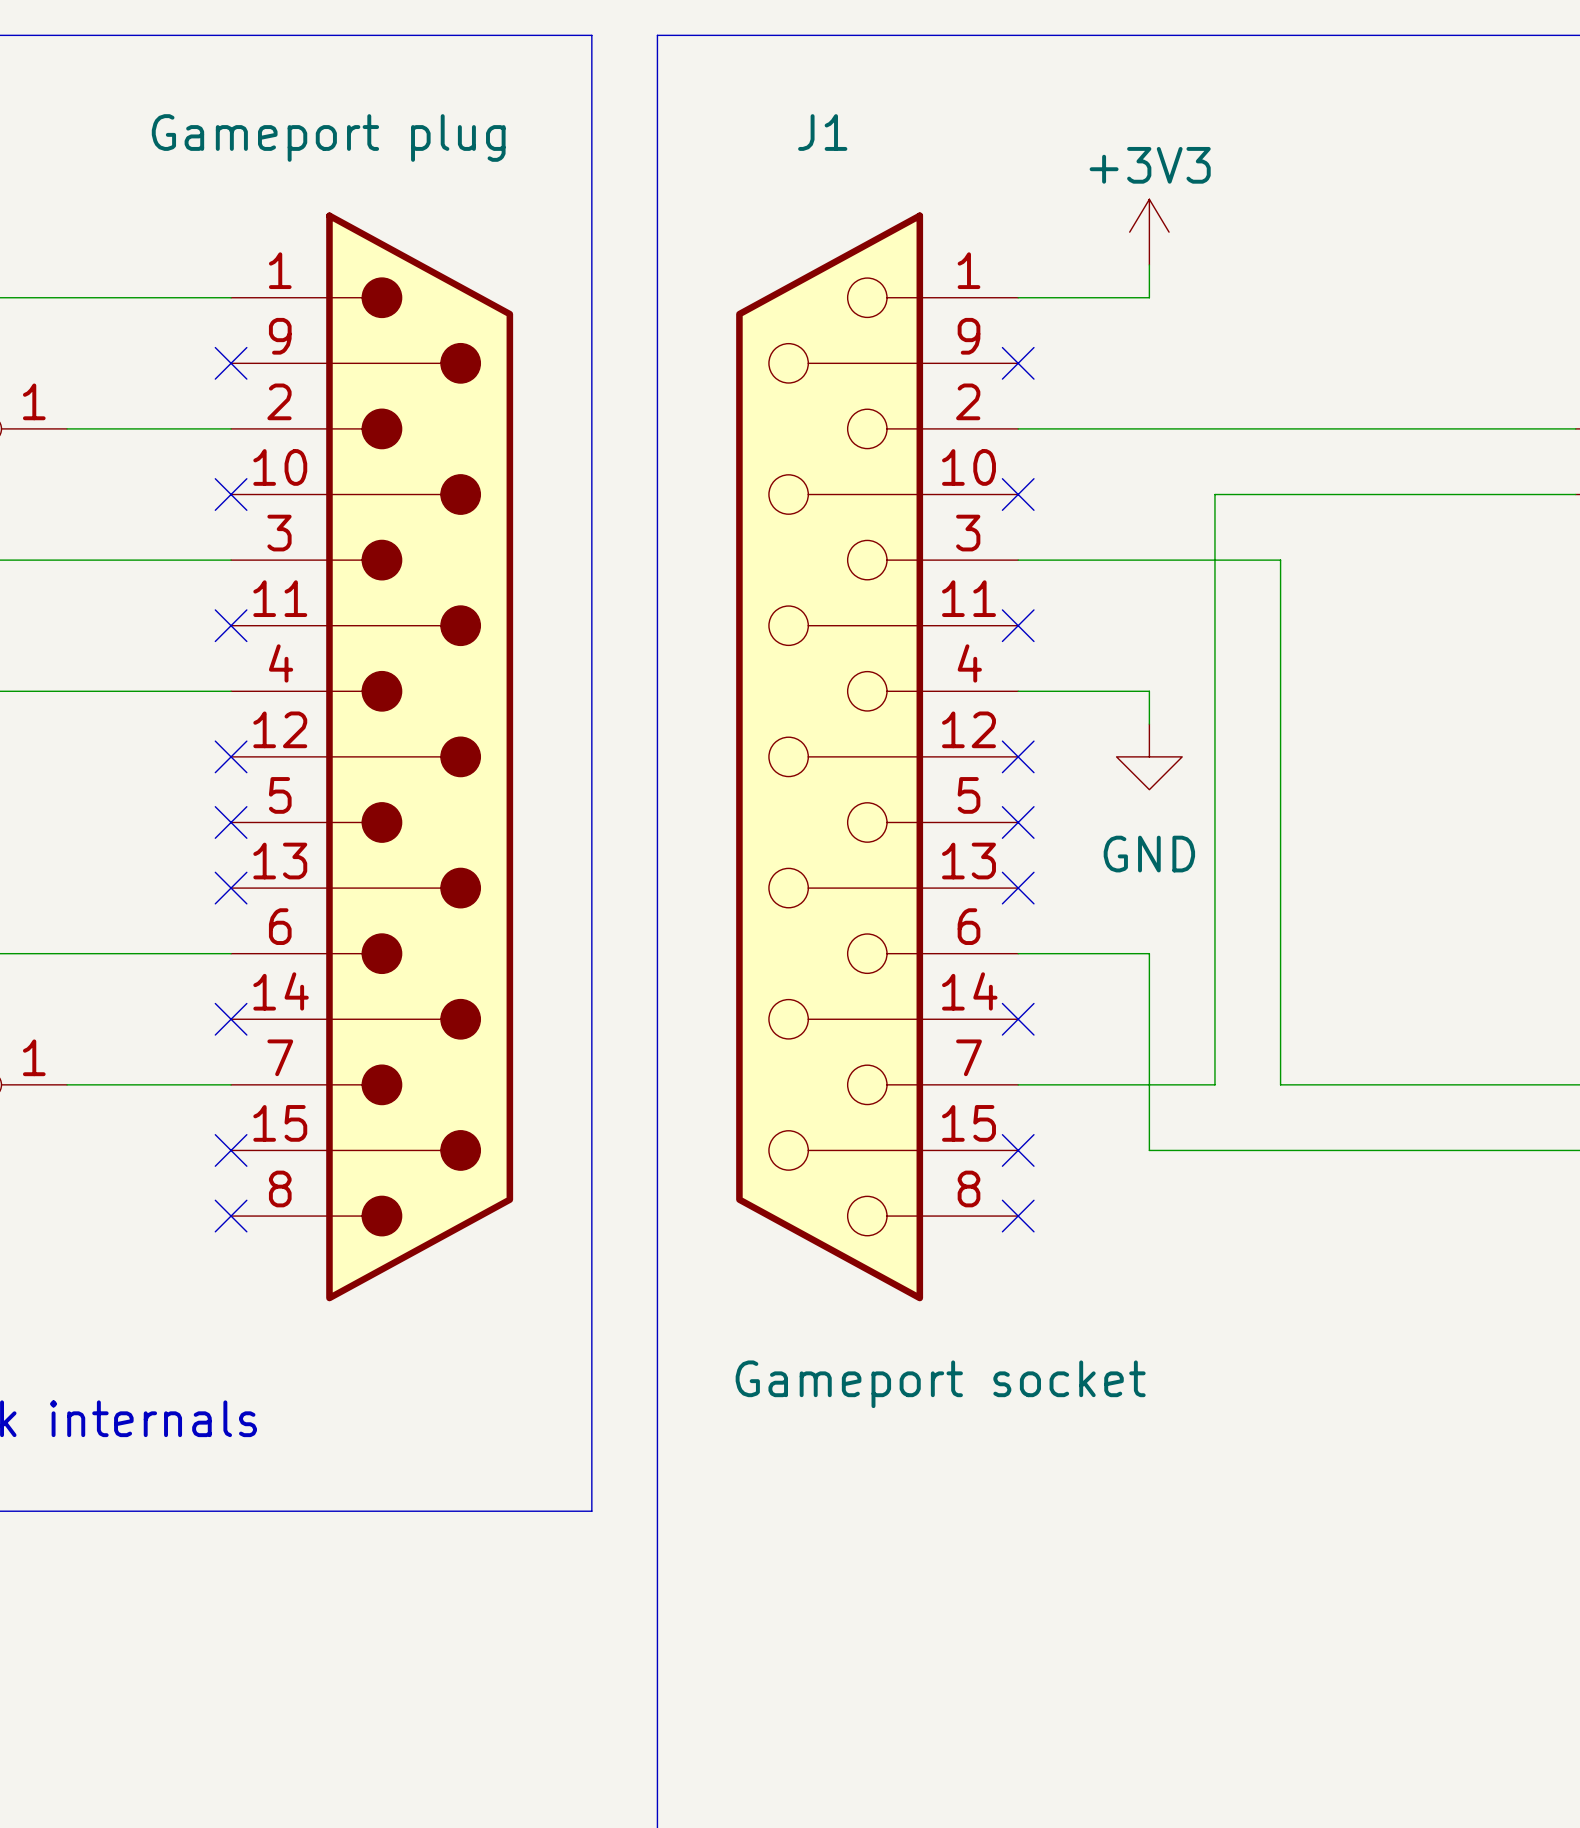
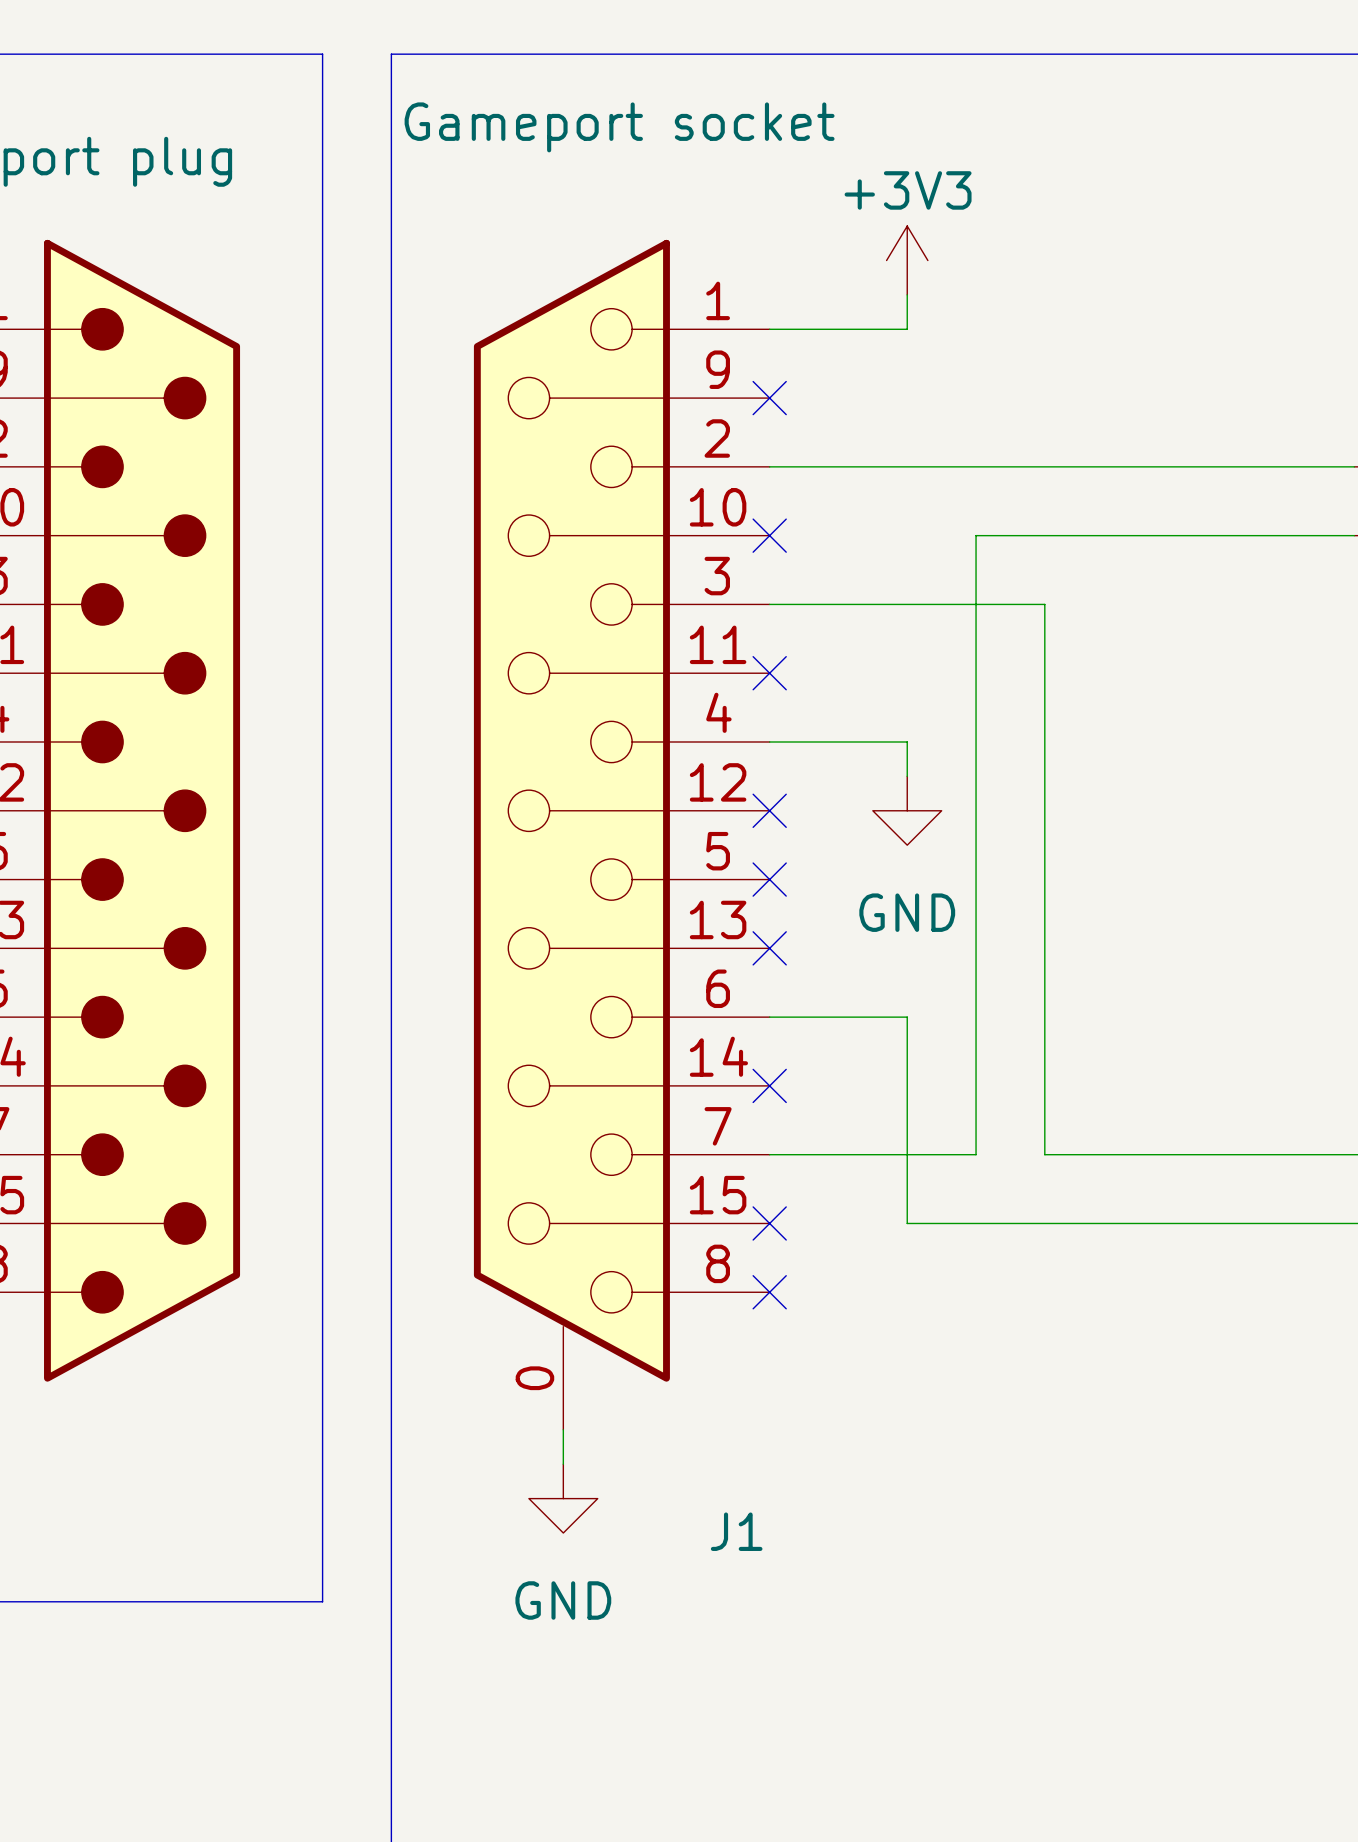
J1 name position: J1 (822, 132) -> J1 (736, 1531)
J1 symbol: [736, 212, 1019, 1302] -> [473, 239, 770, 1430]
wire: none -> (563, 1429) (563, 1464)
J1 value position: Gameport socket (940, 1384) -> Gameport socket (619, 127)
power symbol: none -> GND (563, 1498)

